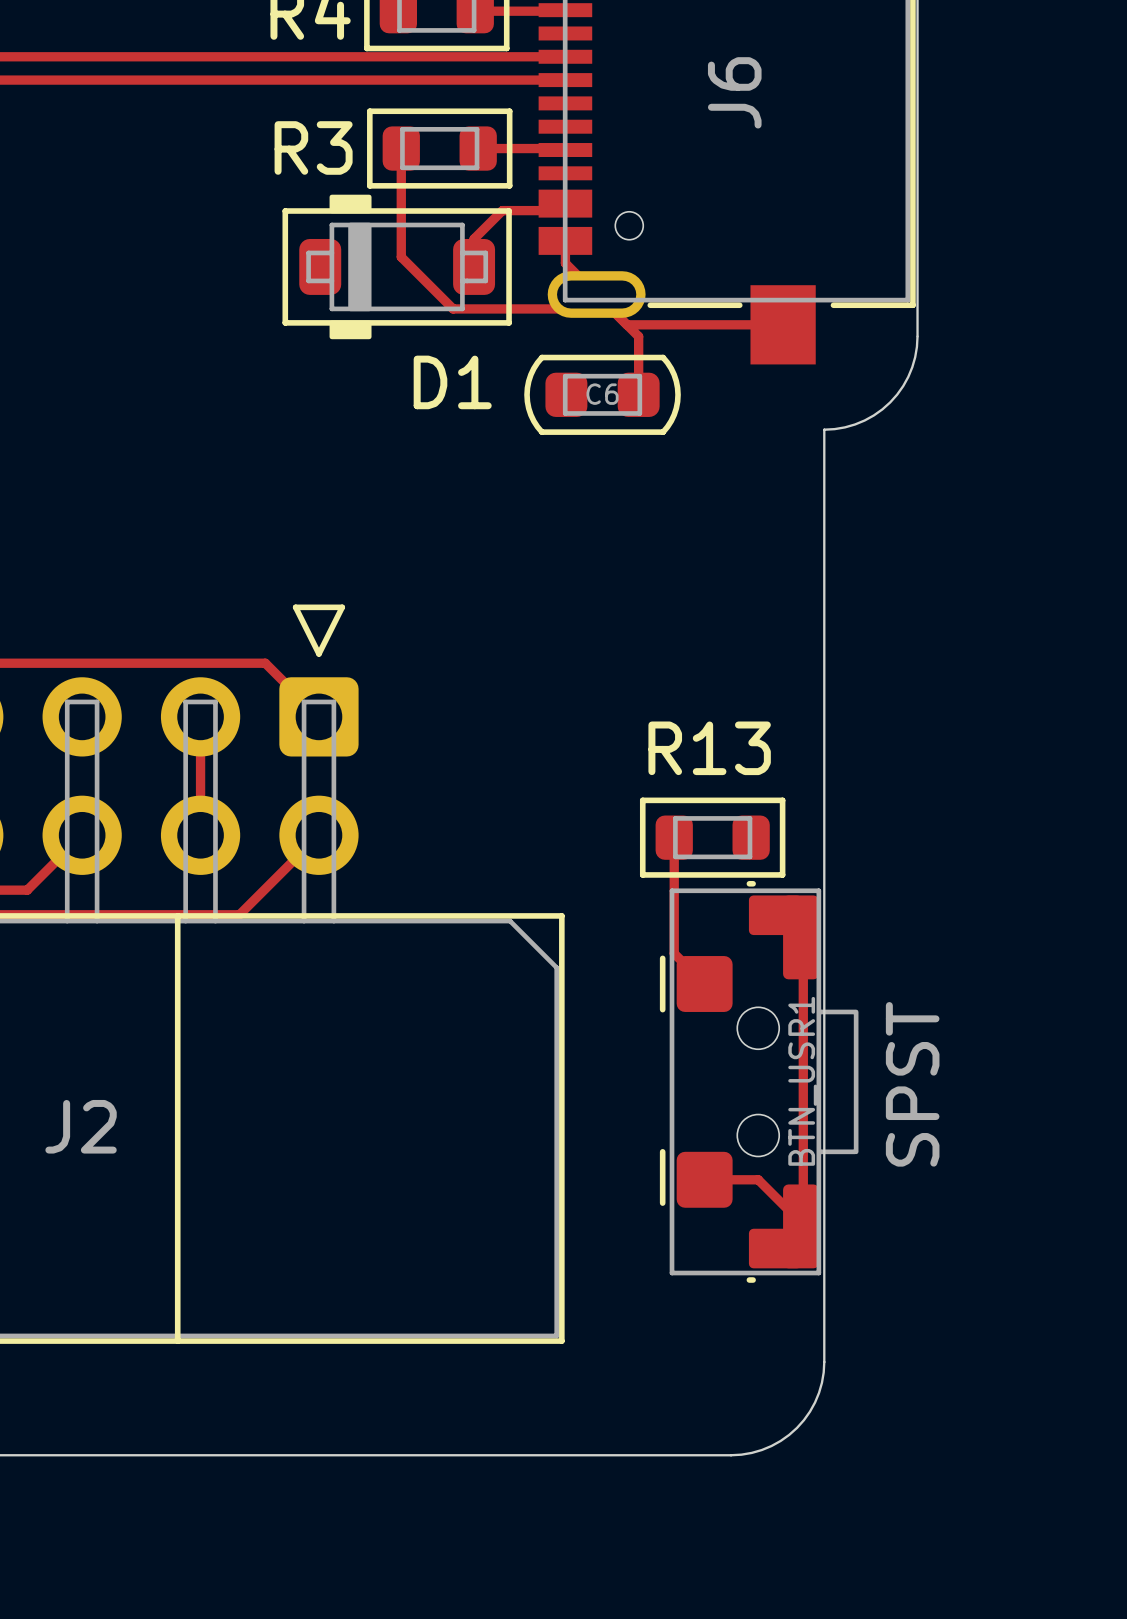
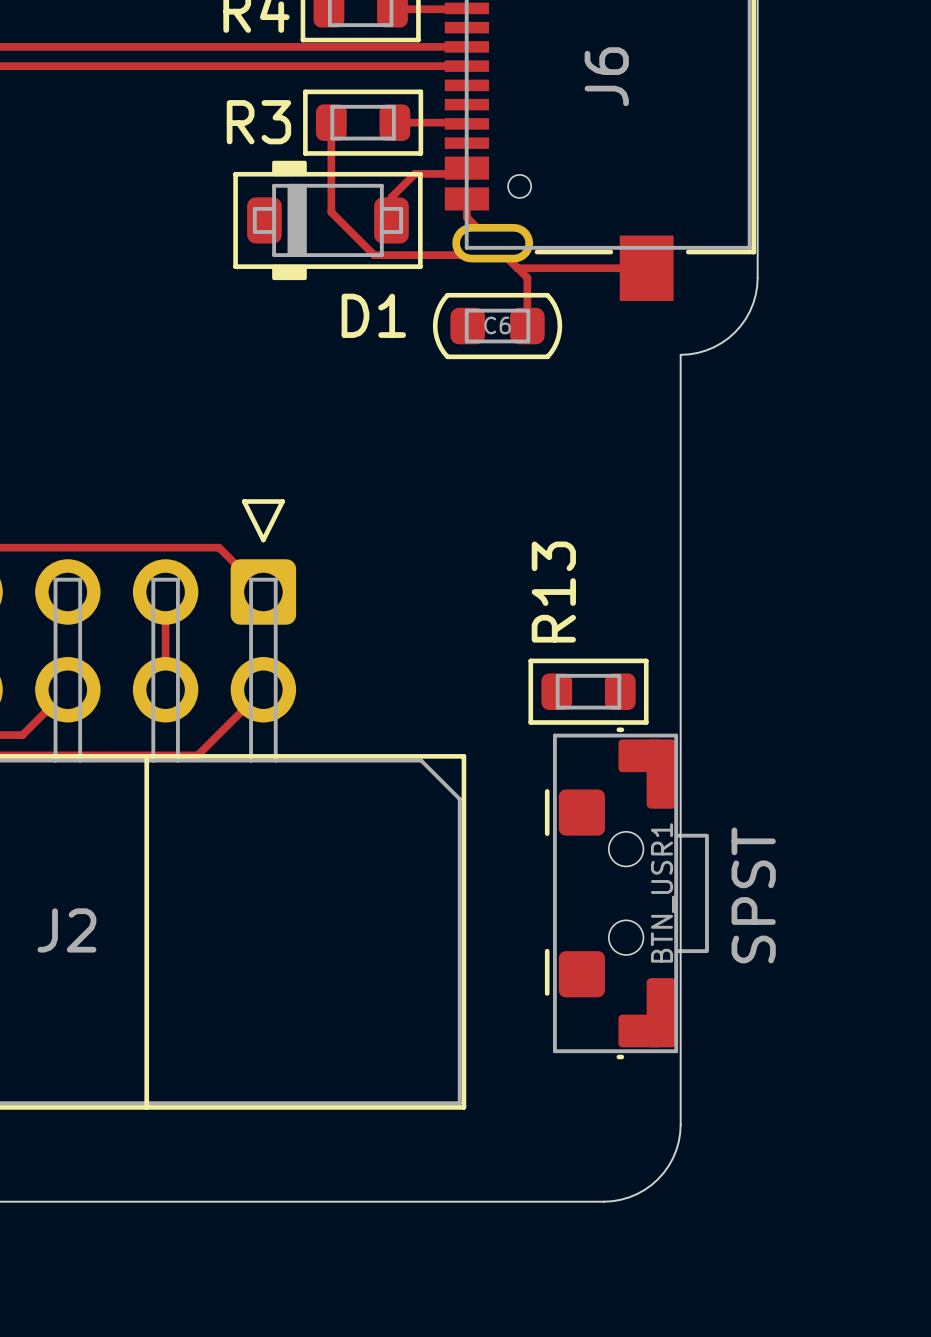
R13 name rotation: 0° (709, 748) -> 90° counterclockwise (553, 592)
top track: (674, 837) (674, 953) (691, 970) -> none
top track: (803, 937) (803, 1224) -> none
top track: (704, 1179) (758, 1179) (804, 1226) -> none

